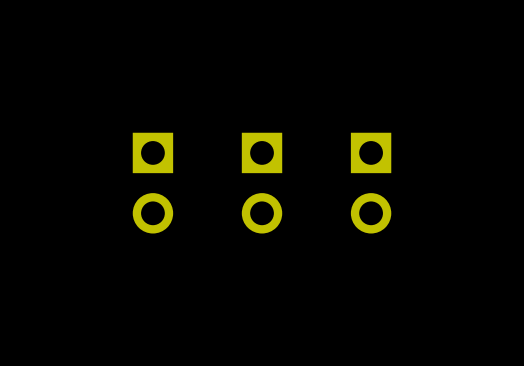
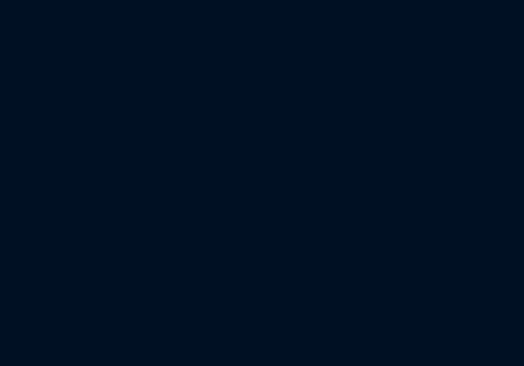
part: (152, 183) -> none
part: (262, 183) -> none
part: (371, 183) -> none

